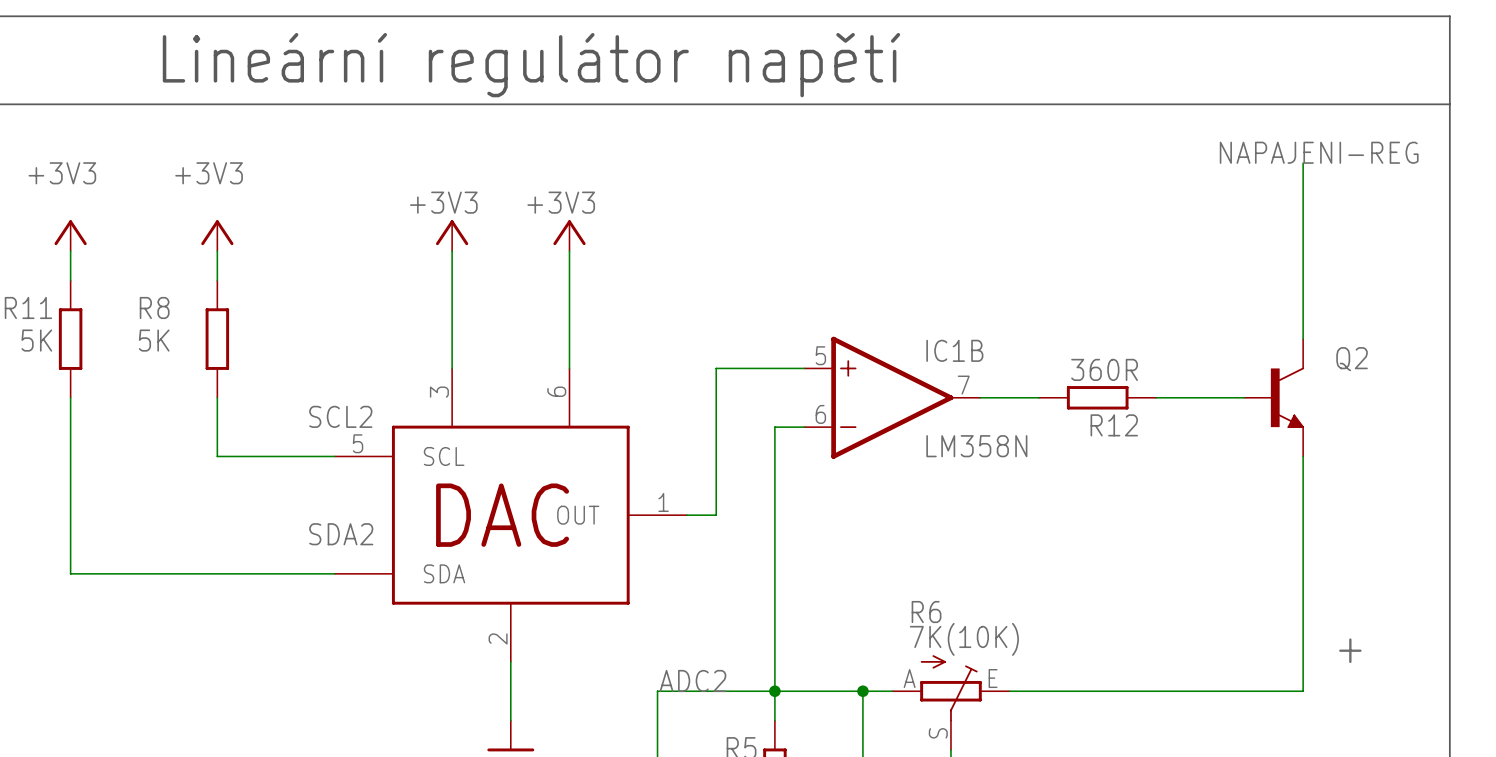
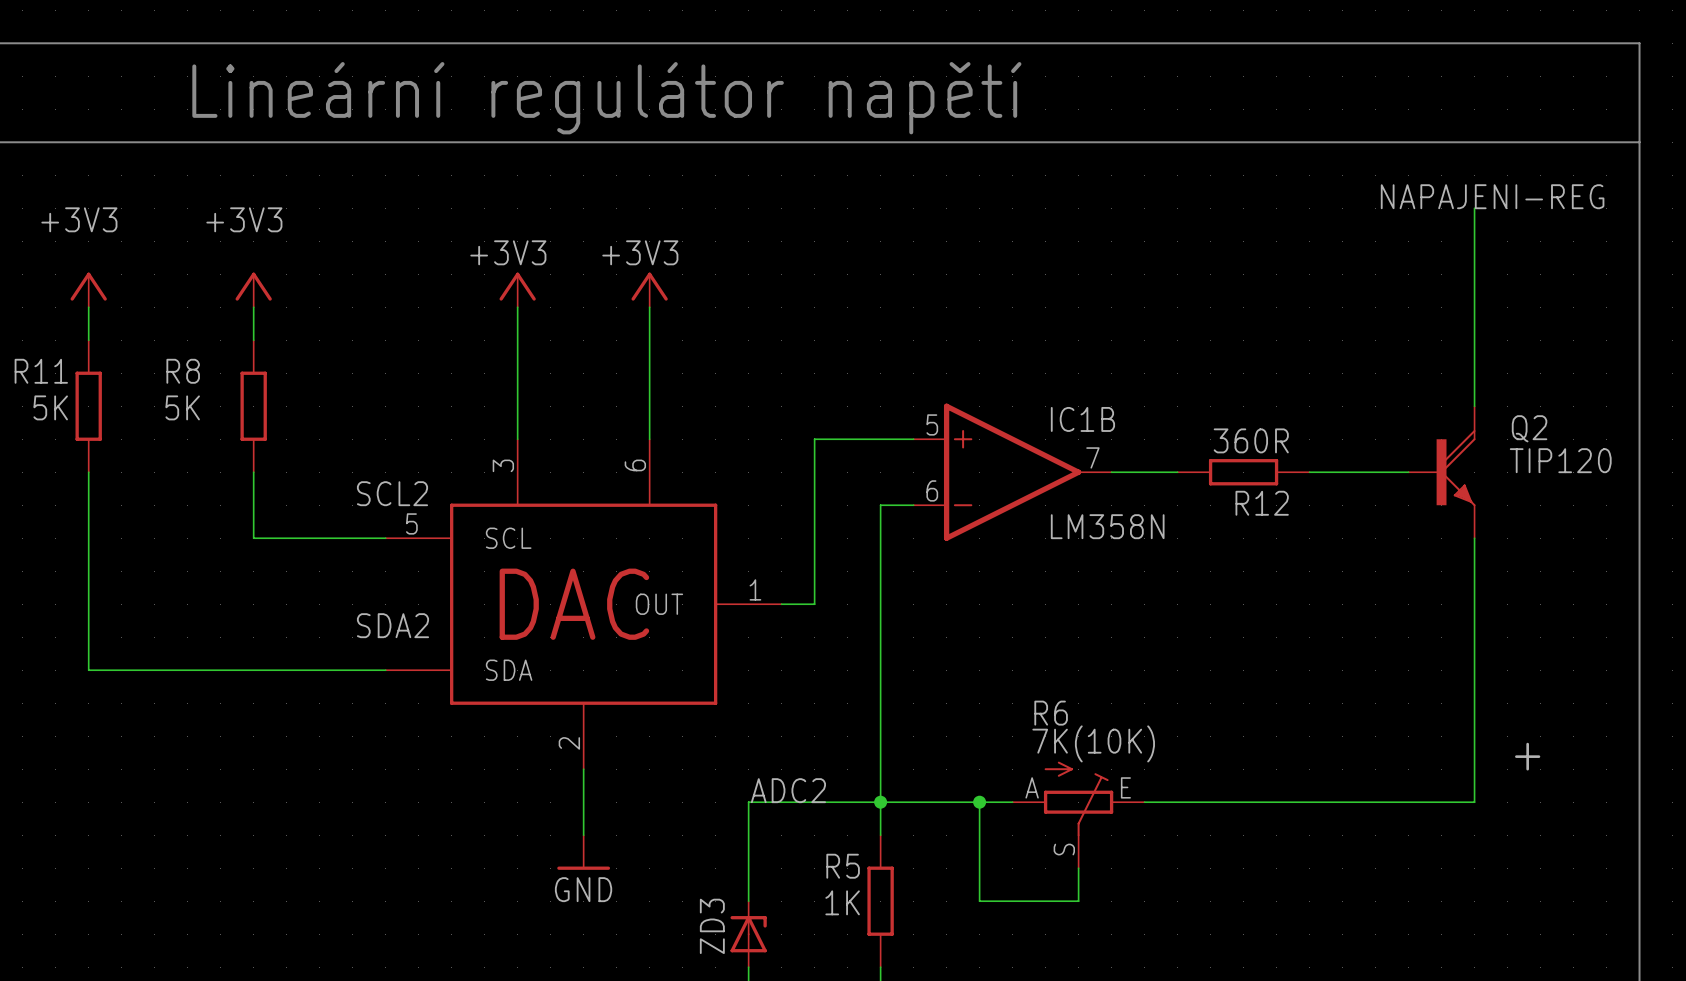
Q2 symbol: [1244, 339, 1305, 457] -> [1408, 406, 1476, 539]
Q2 value: none -> TIP120 (1560, 460)

